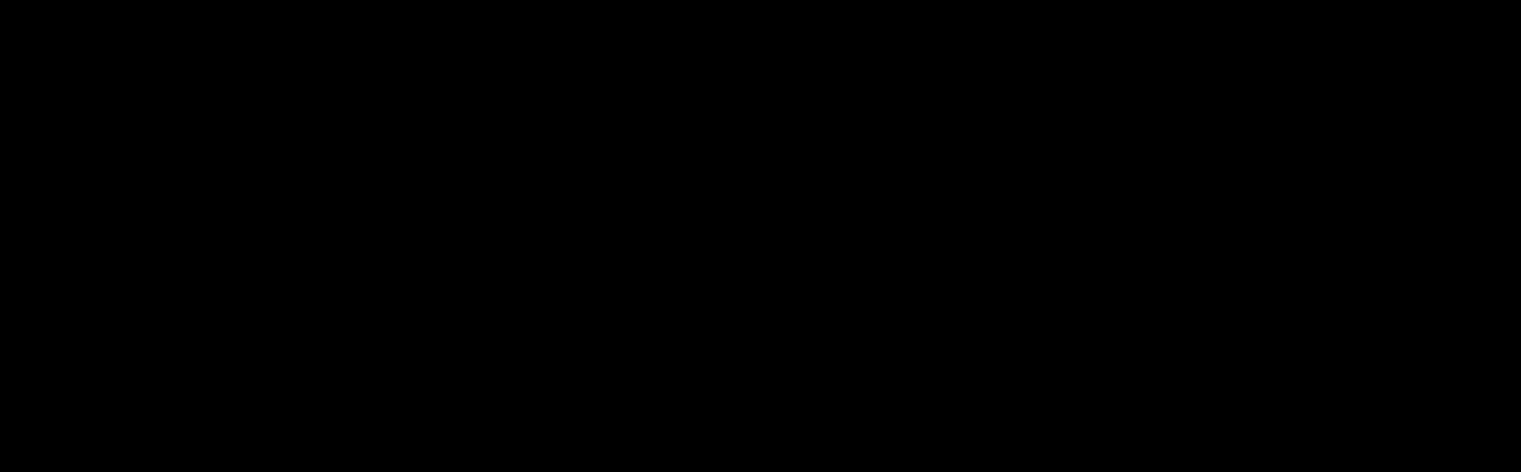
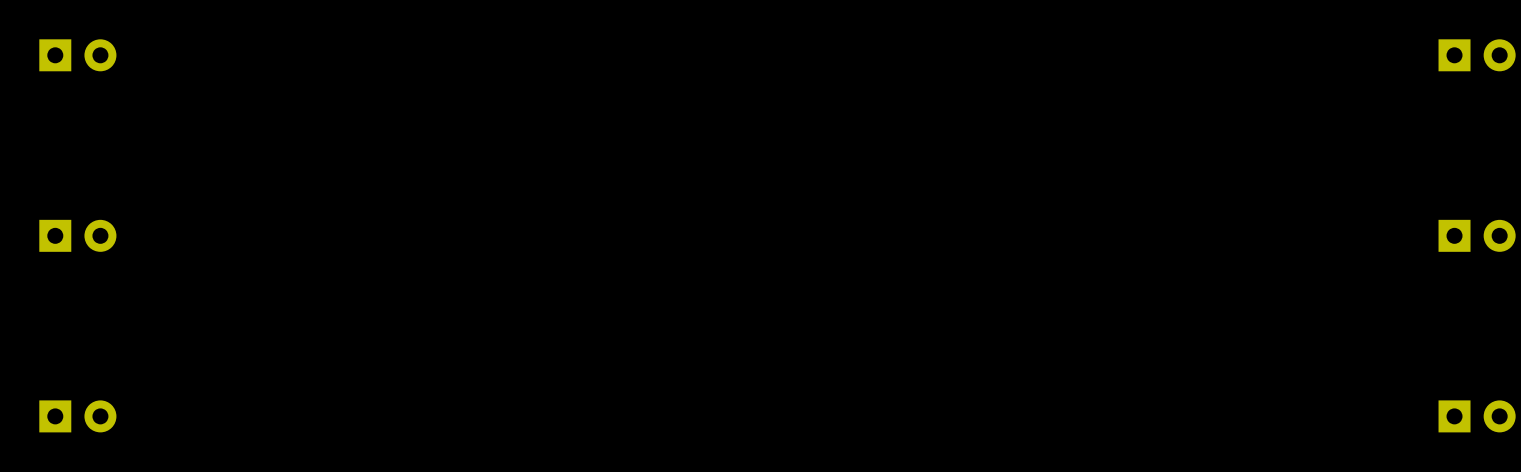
part: none -> (77, 55)
part: none -> (1477, 55)
part: none -> (77, 235)
part: none -> (1477, 235)
part: none -> (77, 416)
part: none -> (1477, 416)

